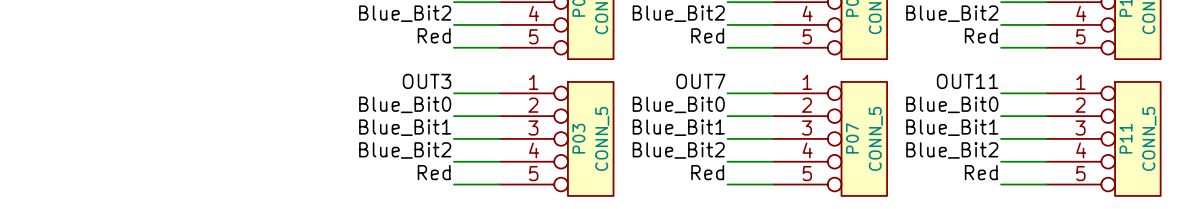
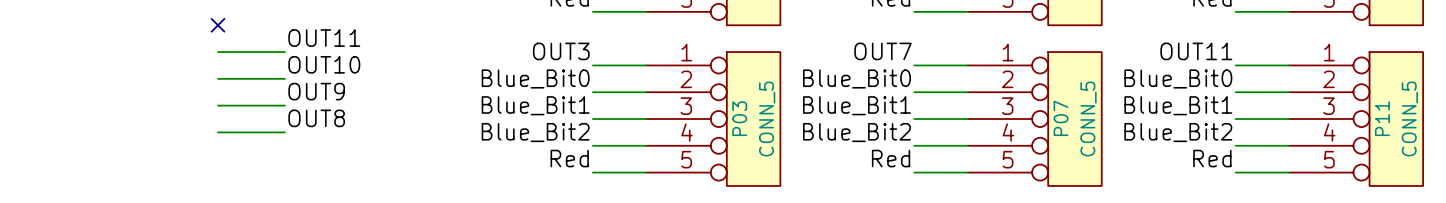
no-connect mark: none -> (218, 25)
label: none -> OUT11 (324, 38)
wire: none -> (218, 52) (284, 52)
label: none -> OUT10 (324, 64)
wire: none -> (218, 78) (284, 78)
label: none -> OUT9 (316, 91)
wire: none -> (218, 105) (284, 105)
label: none -> OUT8 (316, 118)
wire: none -> (218, 132) (284, 132)

